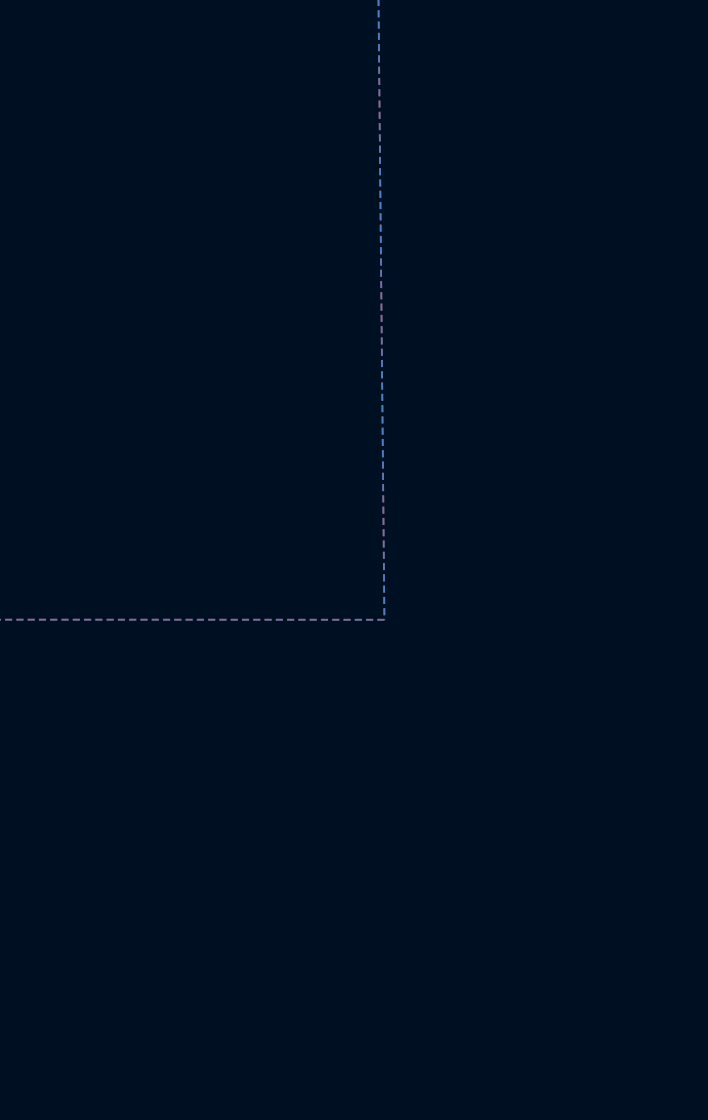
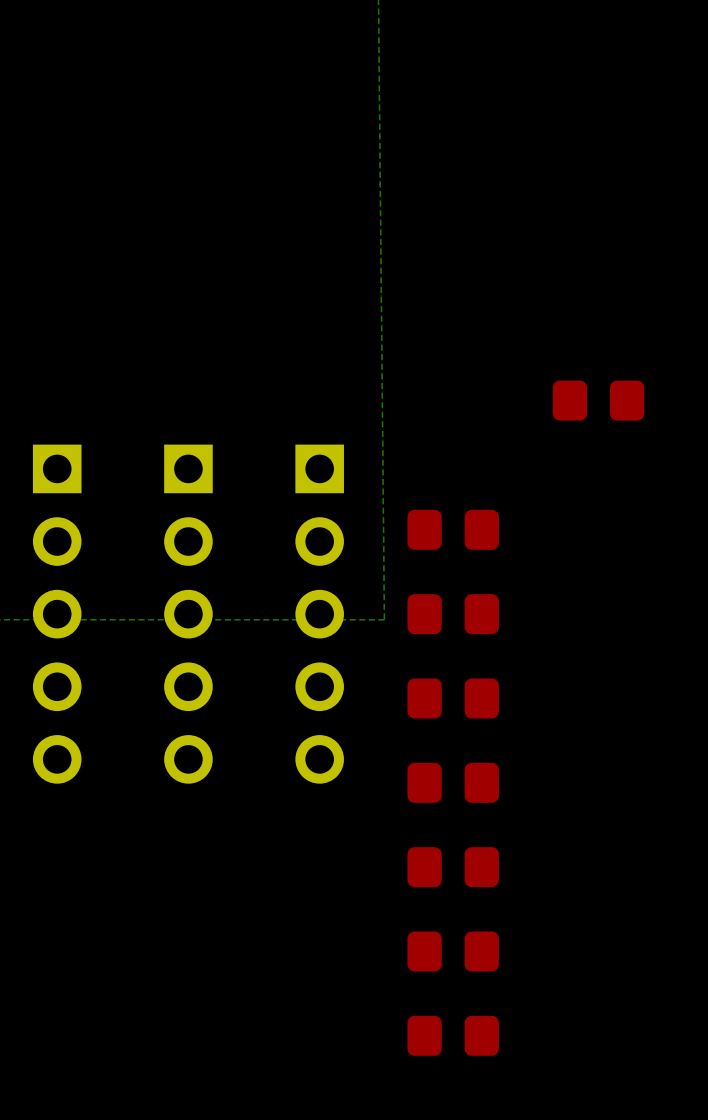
part: none -> (598, 400)
part: none -> (453, 529)
part: none -> (57, 614)
part: none -> (188, 614)
part: none -> (319, 614)
part: none -> (453, 614)
part: none -> (453, 698)
part: none -> (453, 782)
part: none -> (453, 867)
part: none -> (453, 951)
part: none -> (453, 1035)

